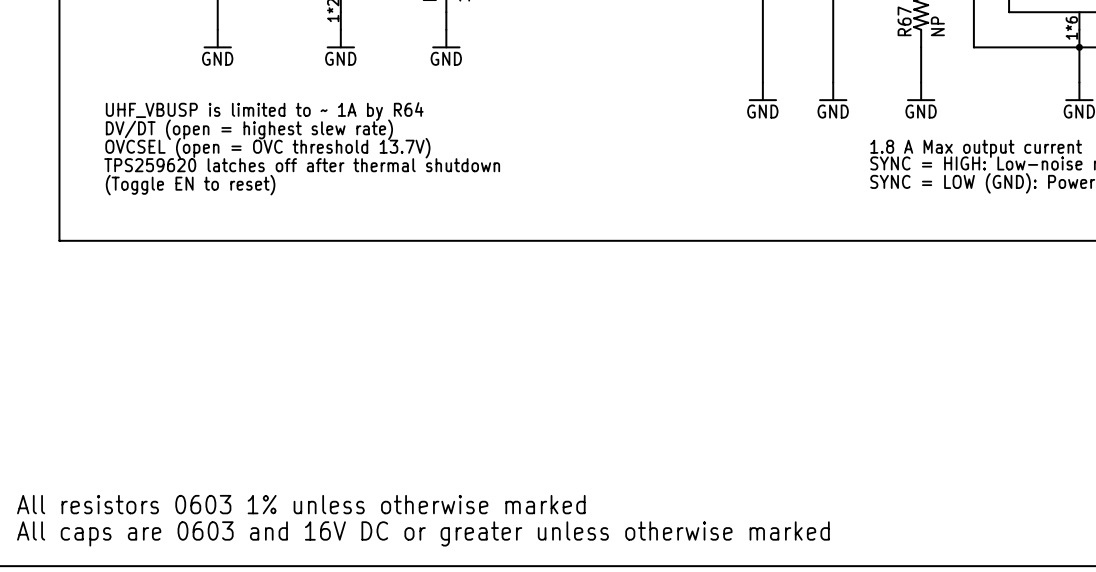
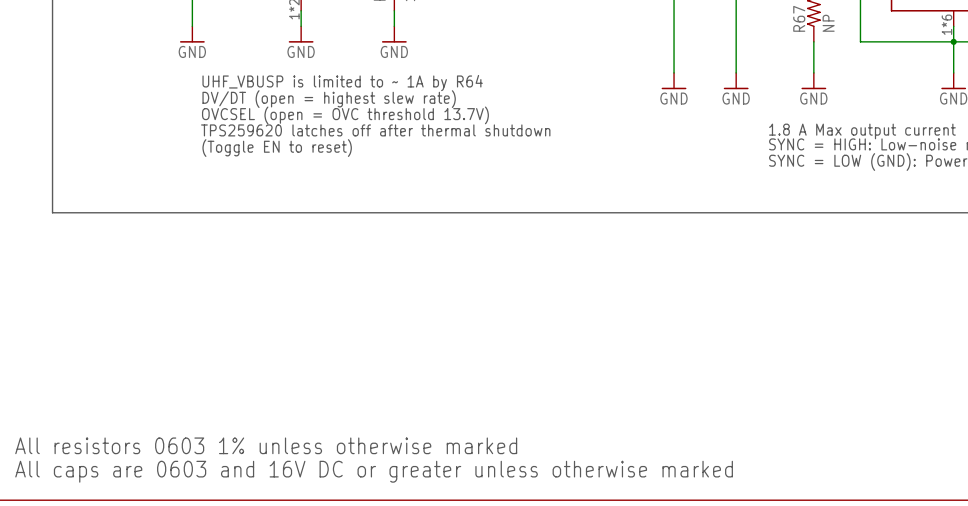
text position: UHF_VBUSP is limited to ~ 1A by R64 (264, 111) -> UHF_VBUSP is limited to ~ 1A by R64 (342, 83)
text position: DV/DT (open = highest slew rate) (249, 129) -> DV/DT (open = highest slew rate) (329, 99)
text position: OVCSEL (open = OVC threshold 13.7V) (267, 148) -> OVCSEL (open = OVC threshold 13.7V) (345, 115)
text position: TPS259620 latches off after thermal shutdown (302, 165) -> TPS259620 latches off after thermal shutdown (375, 130)
text position: (Toggle EN to reset) (190, 185) -> (Toggle EN to reset) (277, 148)

